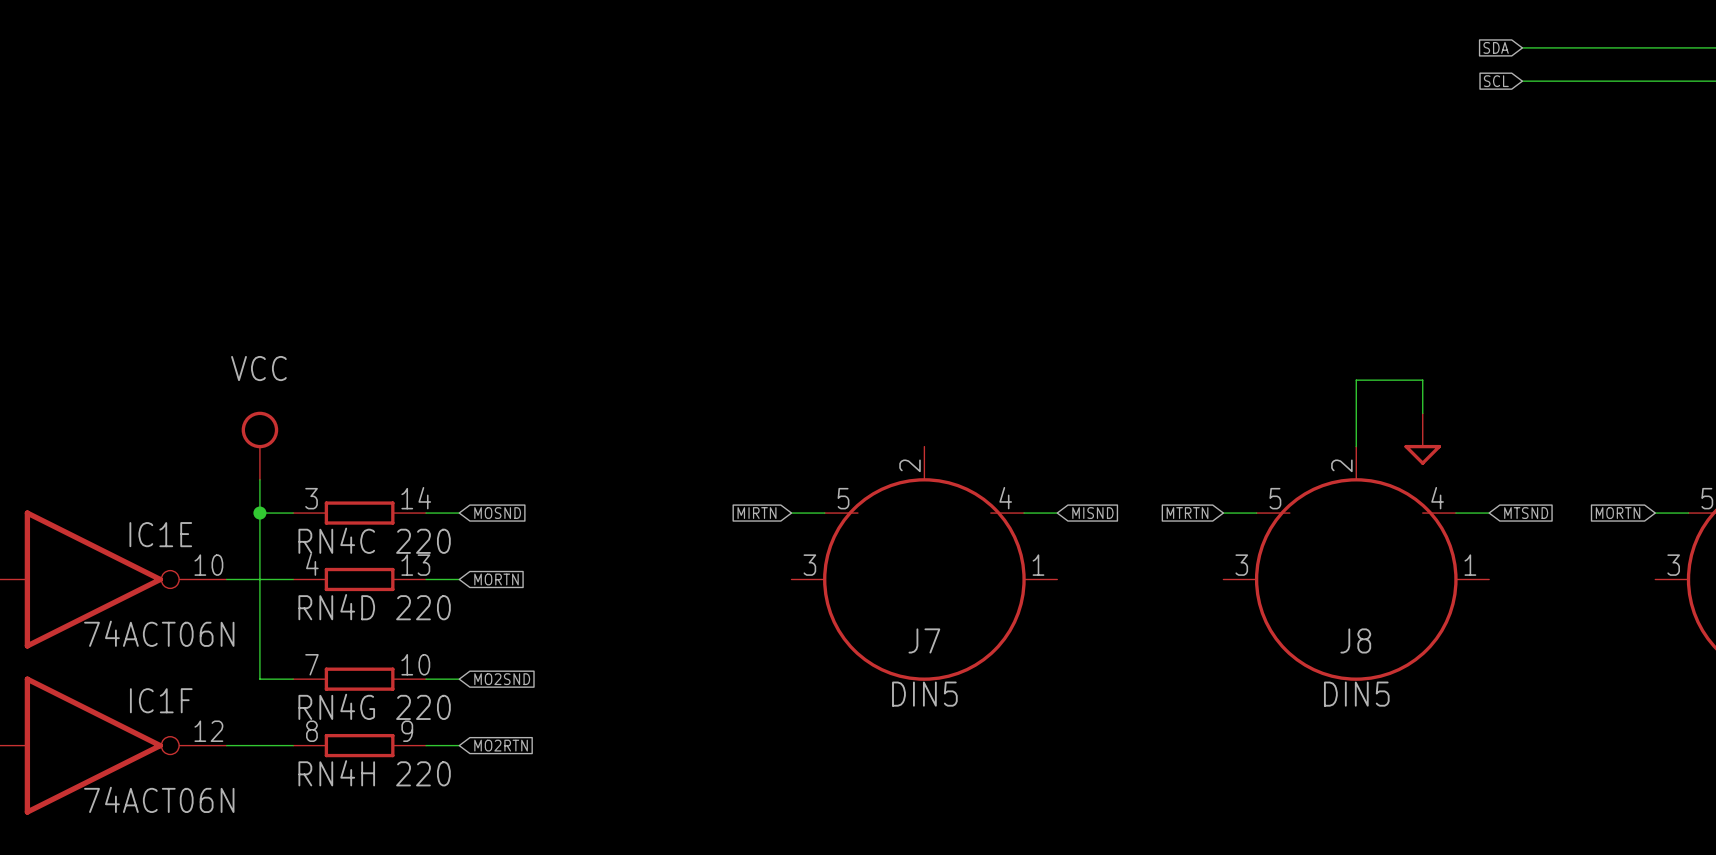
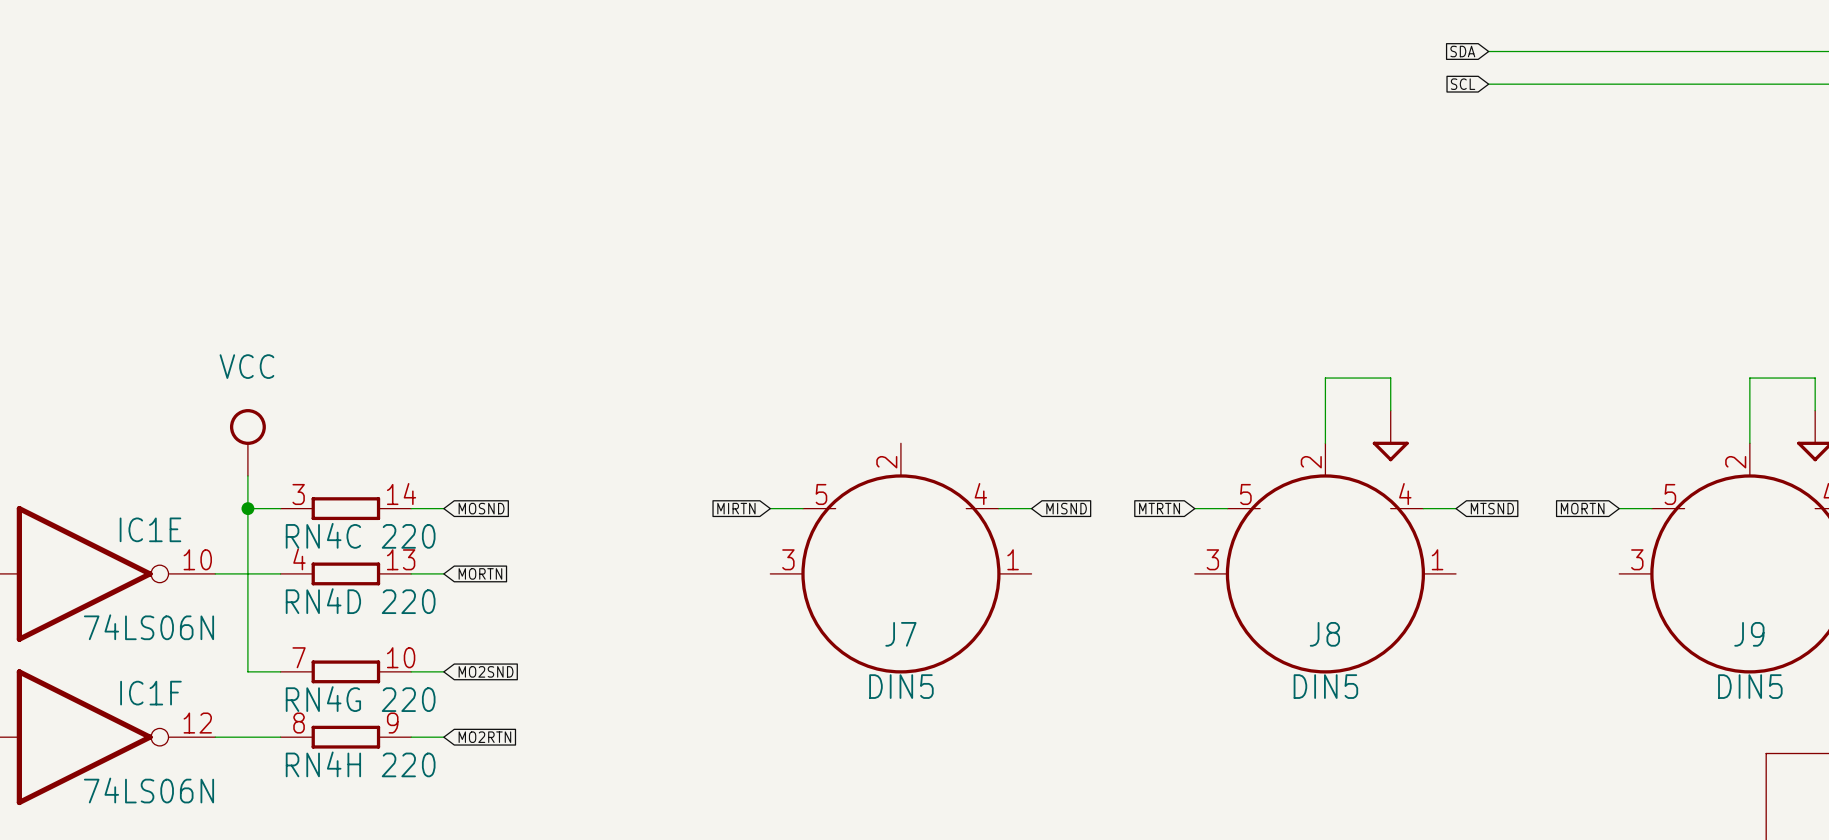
IC1E value: 74ACT06N (159, 633) -> 74LS06N (149, 627)
IC1F value: 74ACT06N (159, 799) -> 74LS06N (149, 790)

